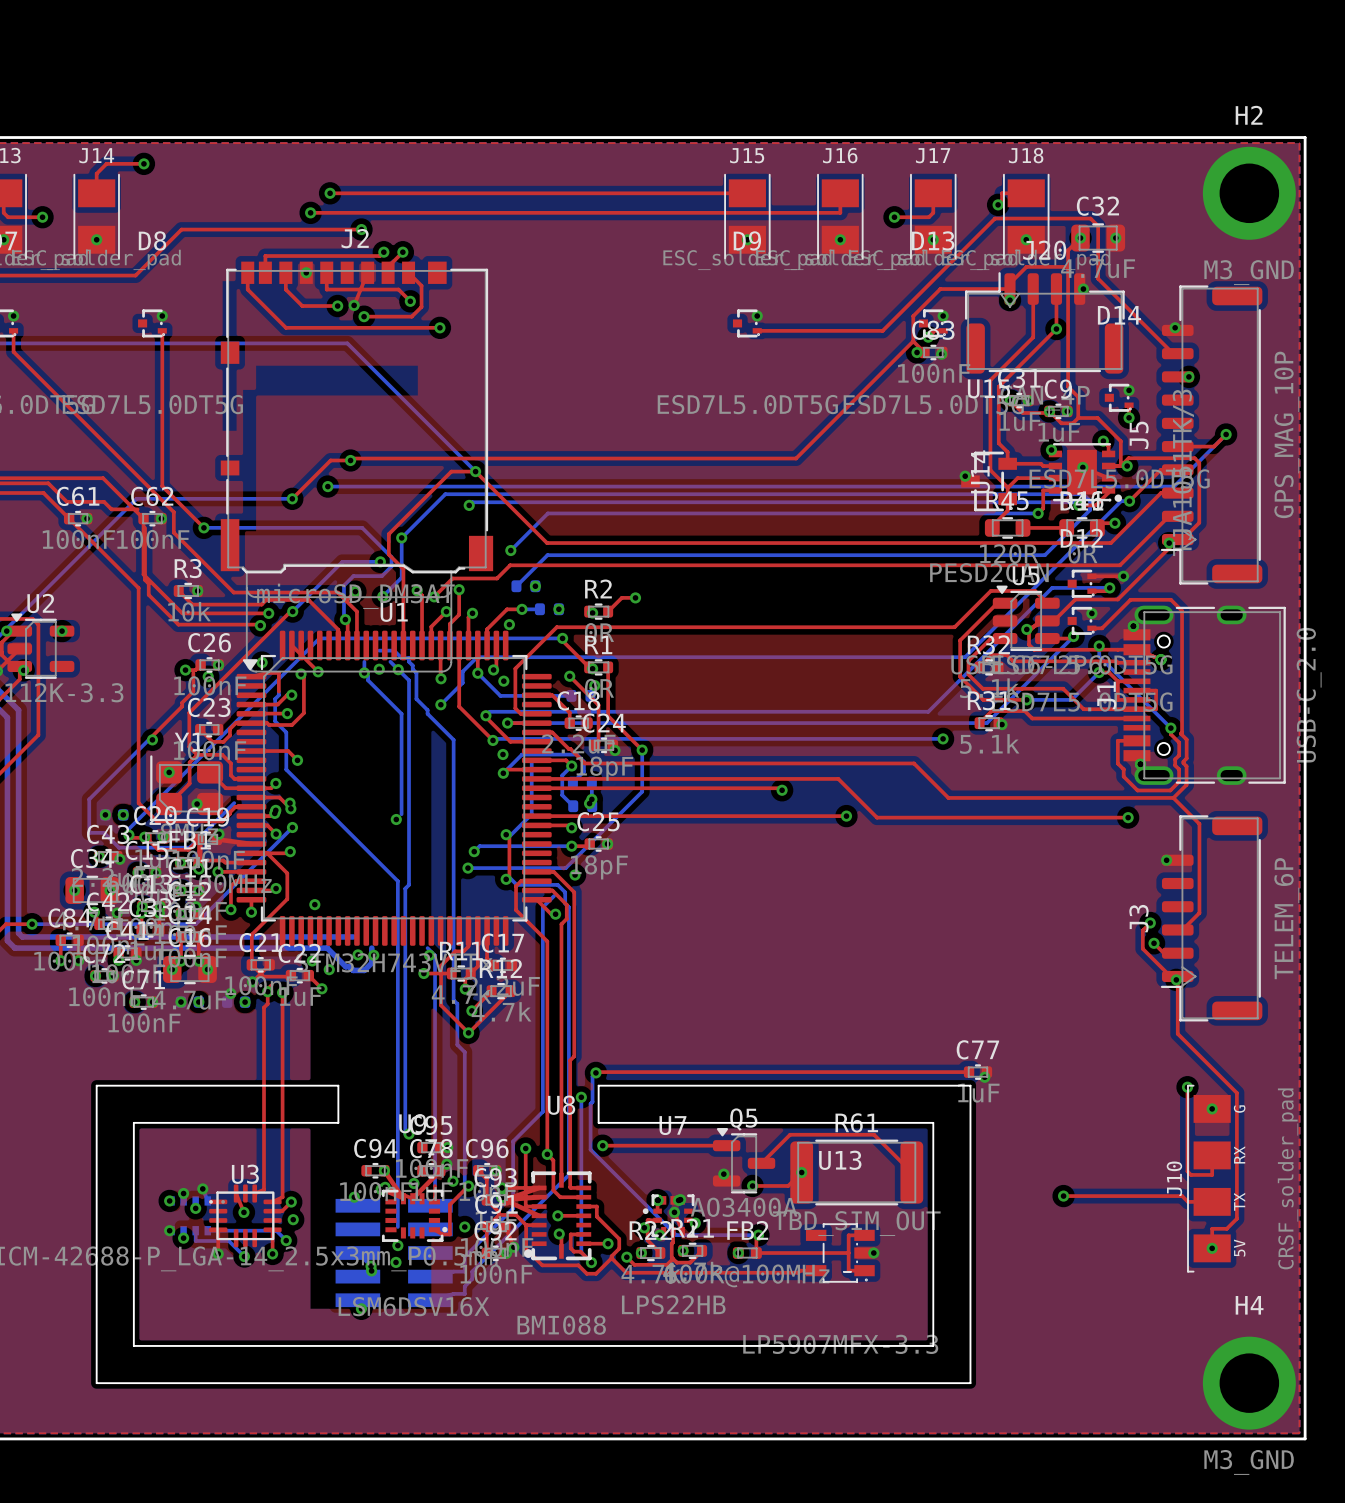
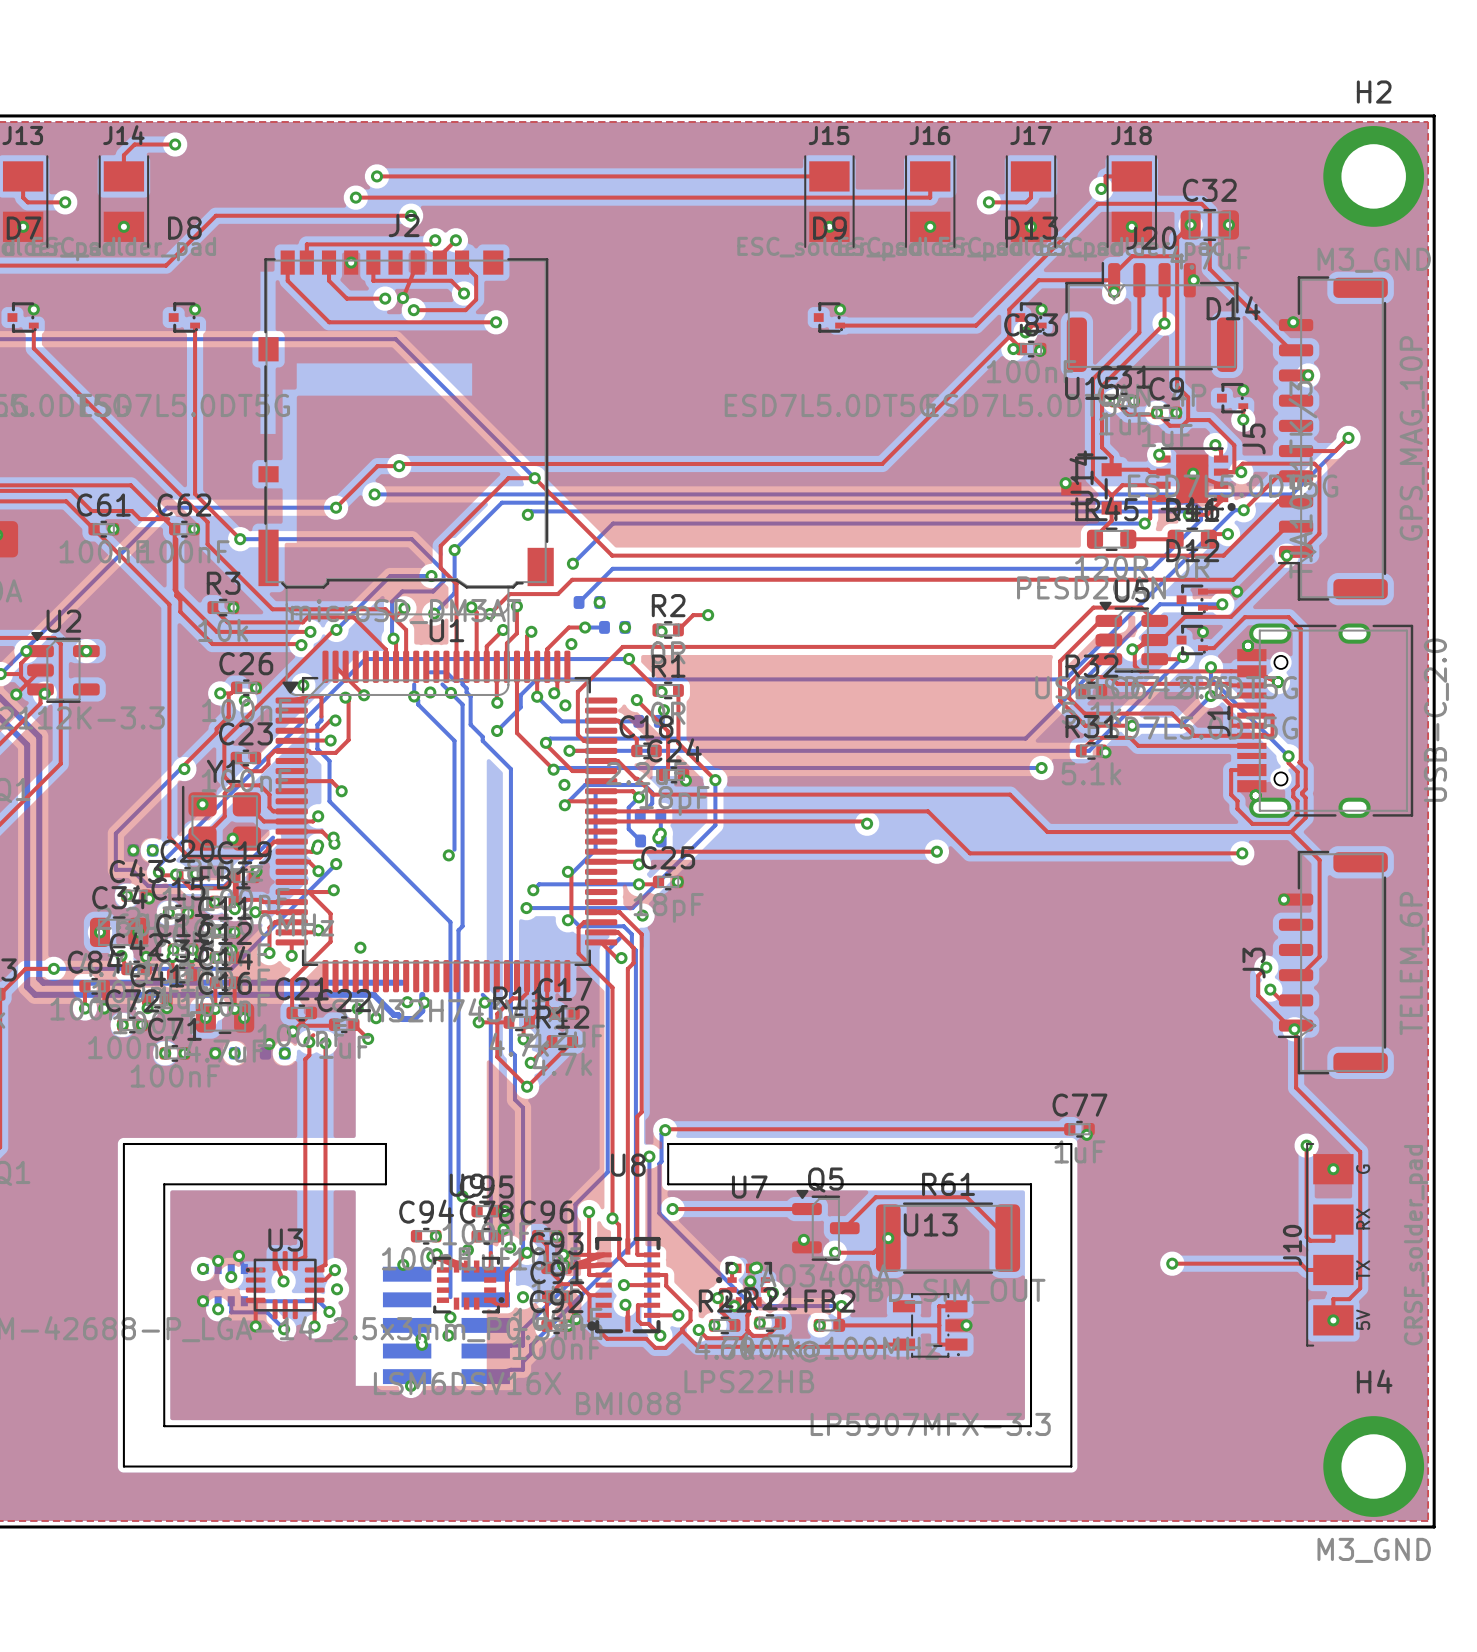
top track: (216, 839) (251, 844) -> none
top track: (384, 1170) (403, 1198) -> none
top track: (440, 1170) (412, 1198) -> none
top track: (504, 1199) (539, 1215) -> none

